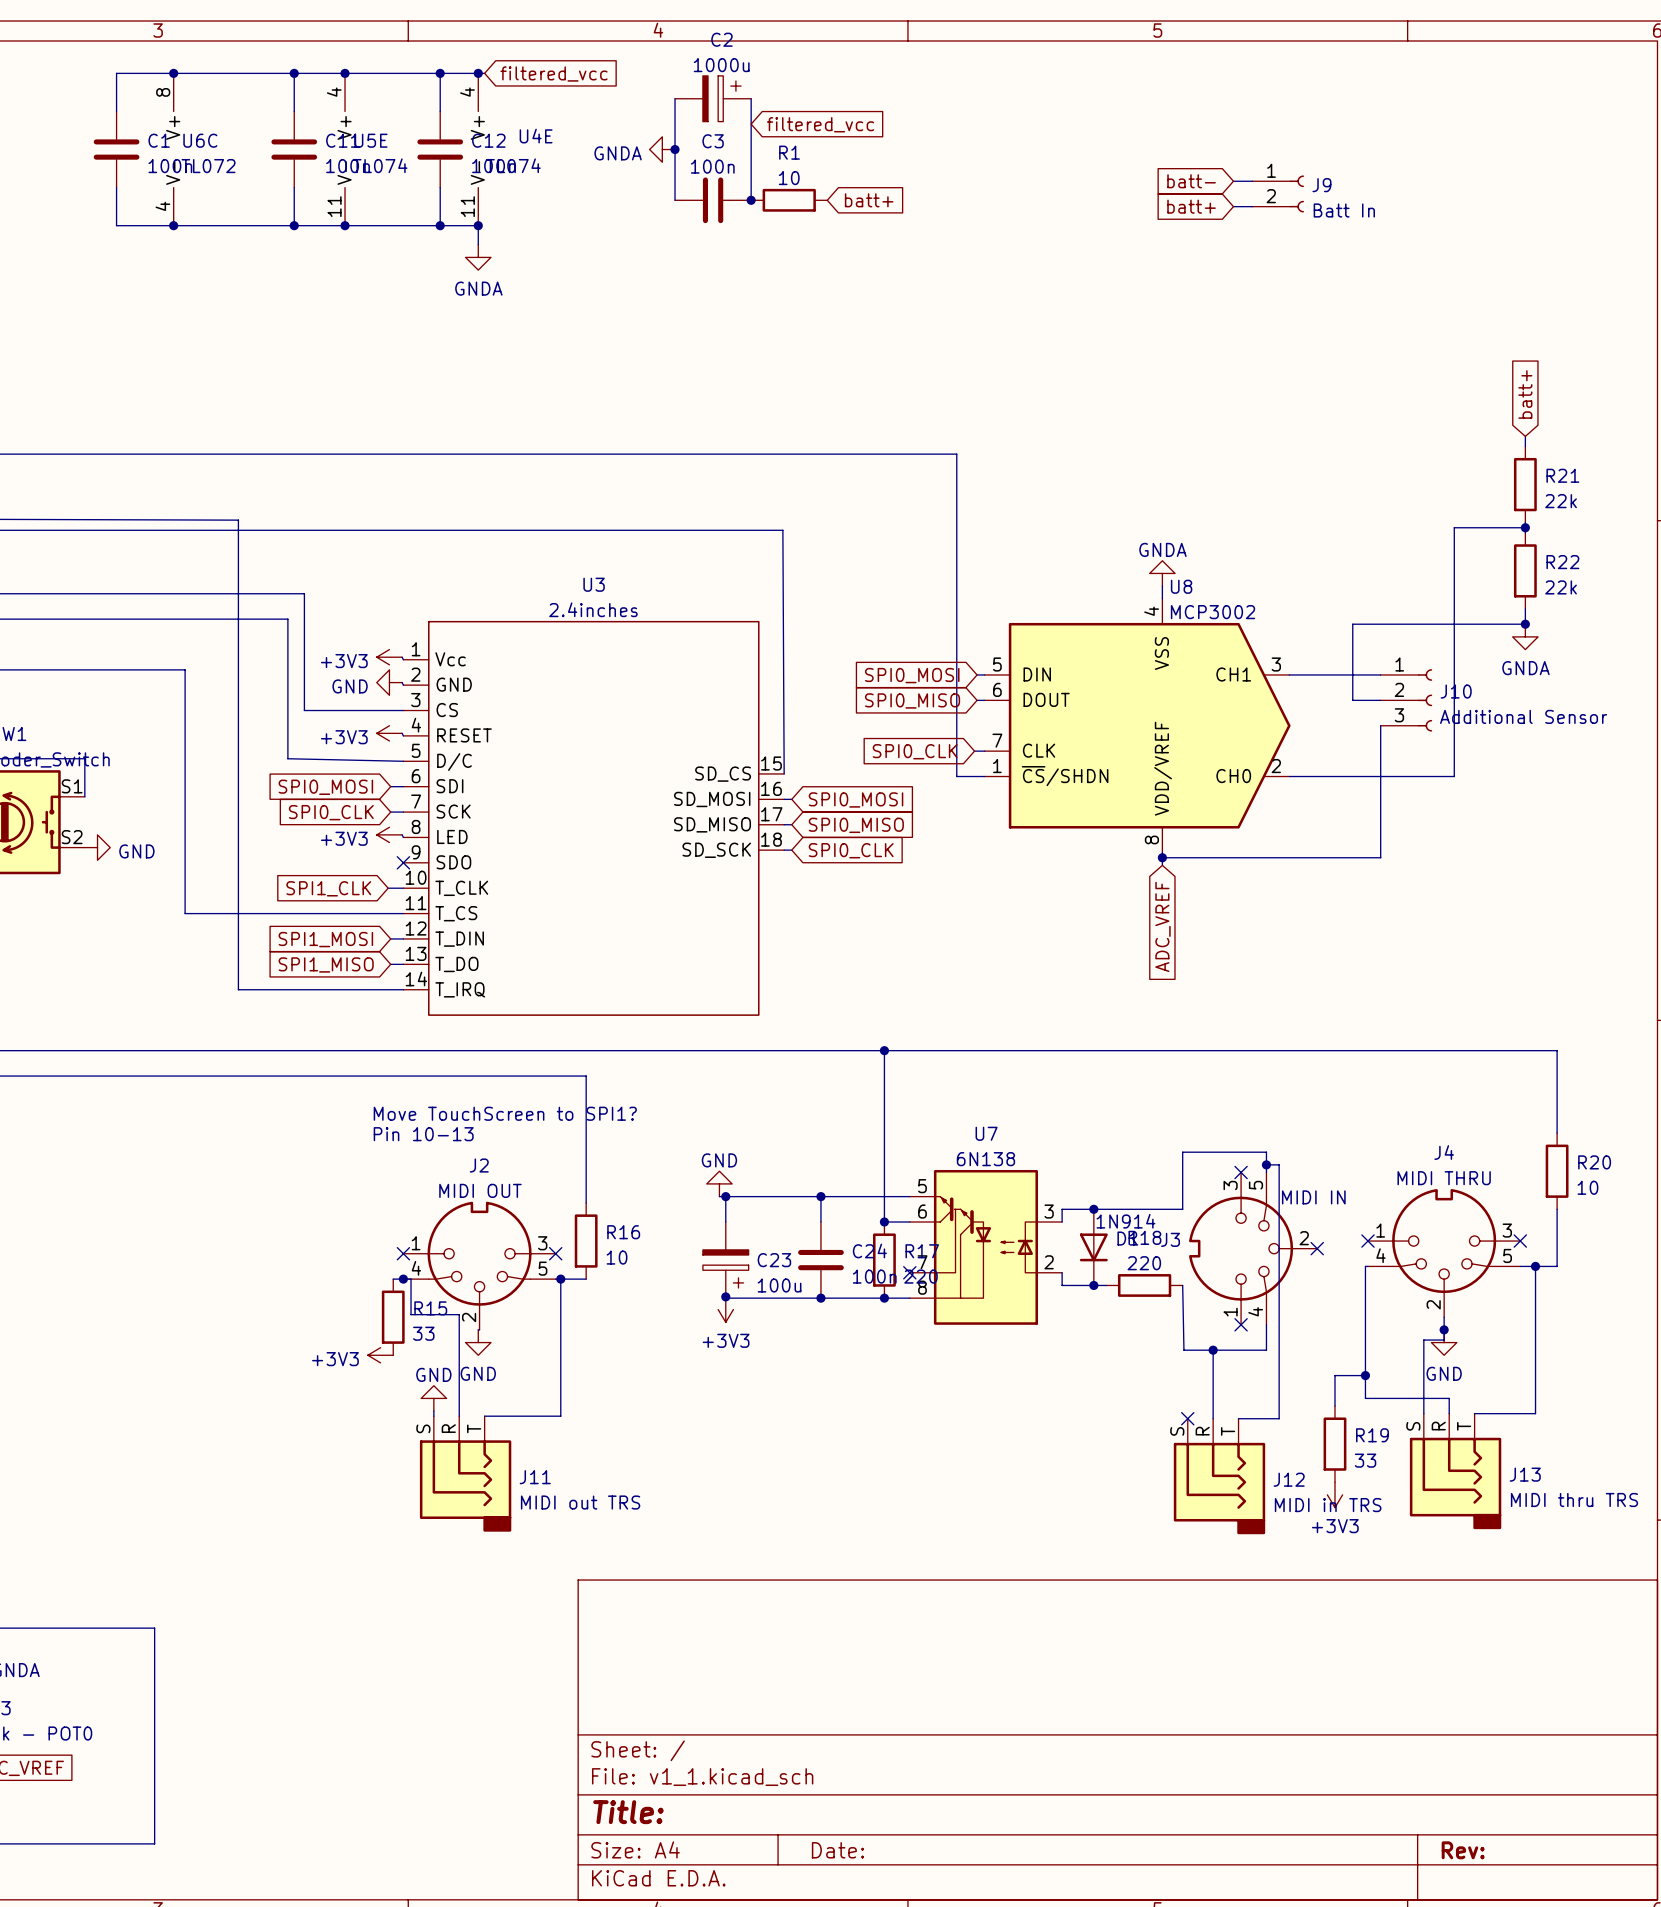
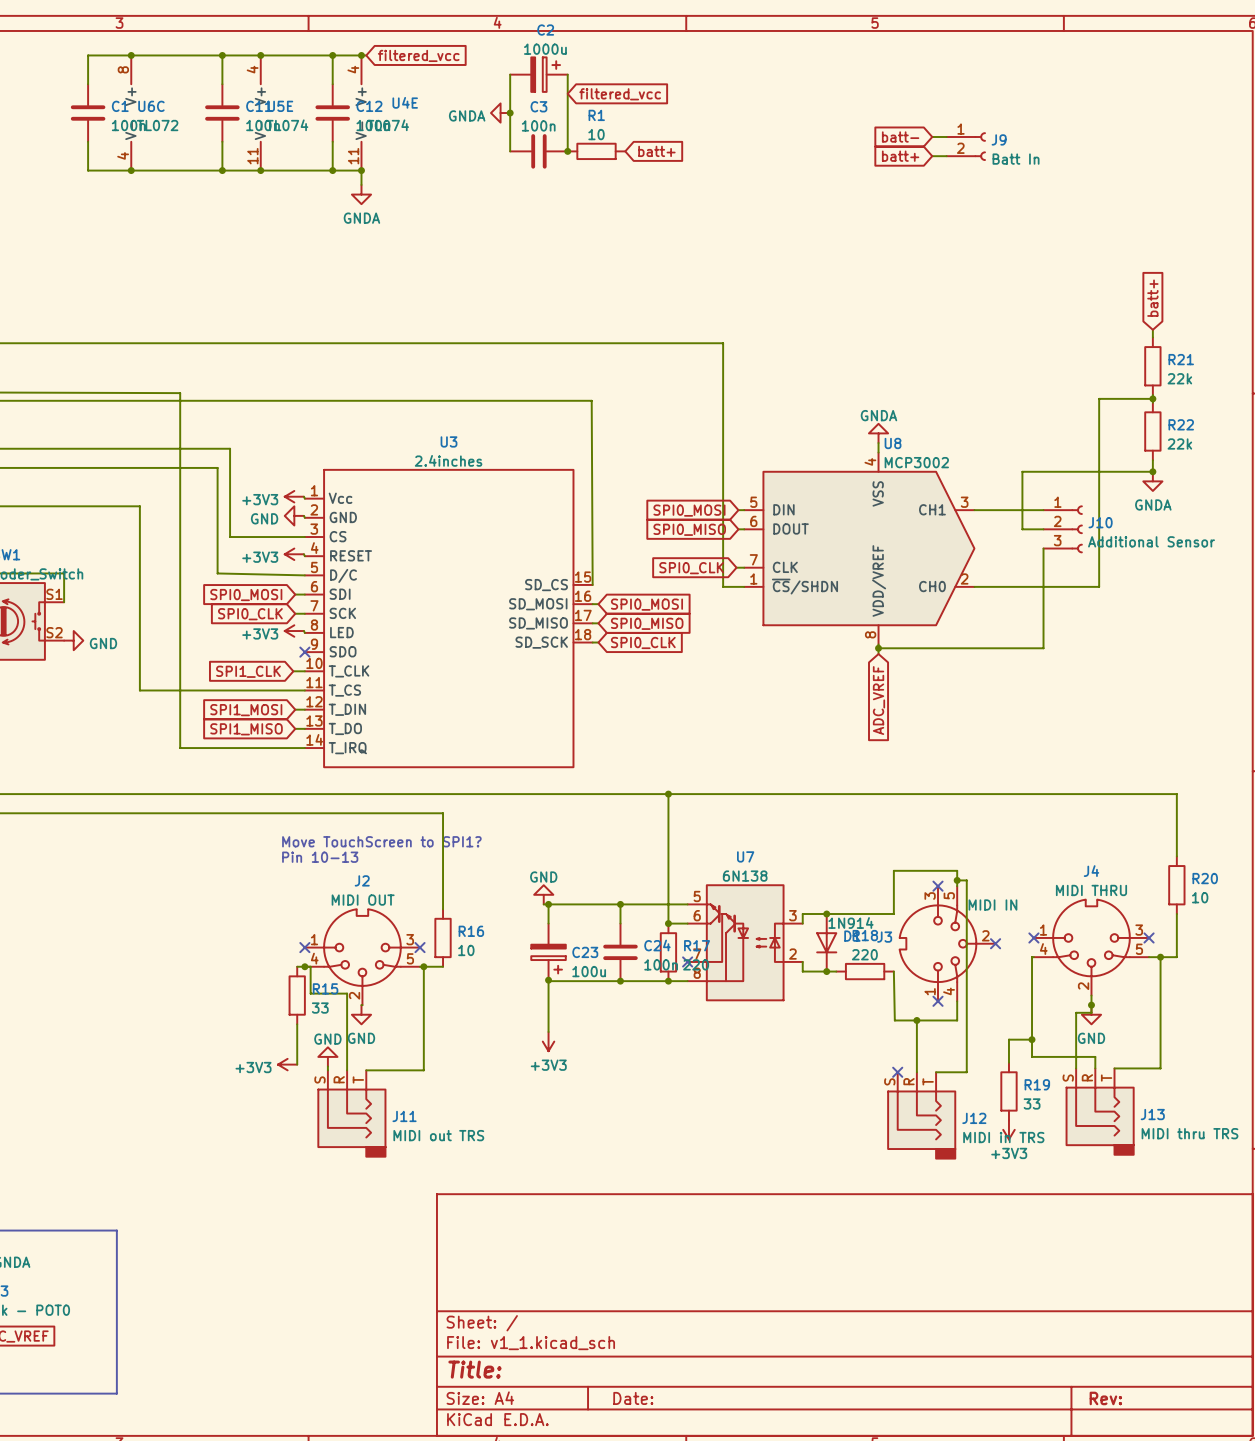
wire: none -> (548, 980) (548, 1031)
power symbol position: +3V3 (725, 1309) -> +3V3 (548, 1041)
power symbol position: +3V3 (380, 1355) -> +3V3 (287, 1064)
wire: none -> (297, 1024) (297, 1064)

